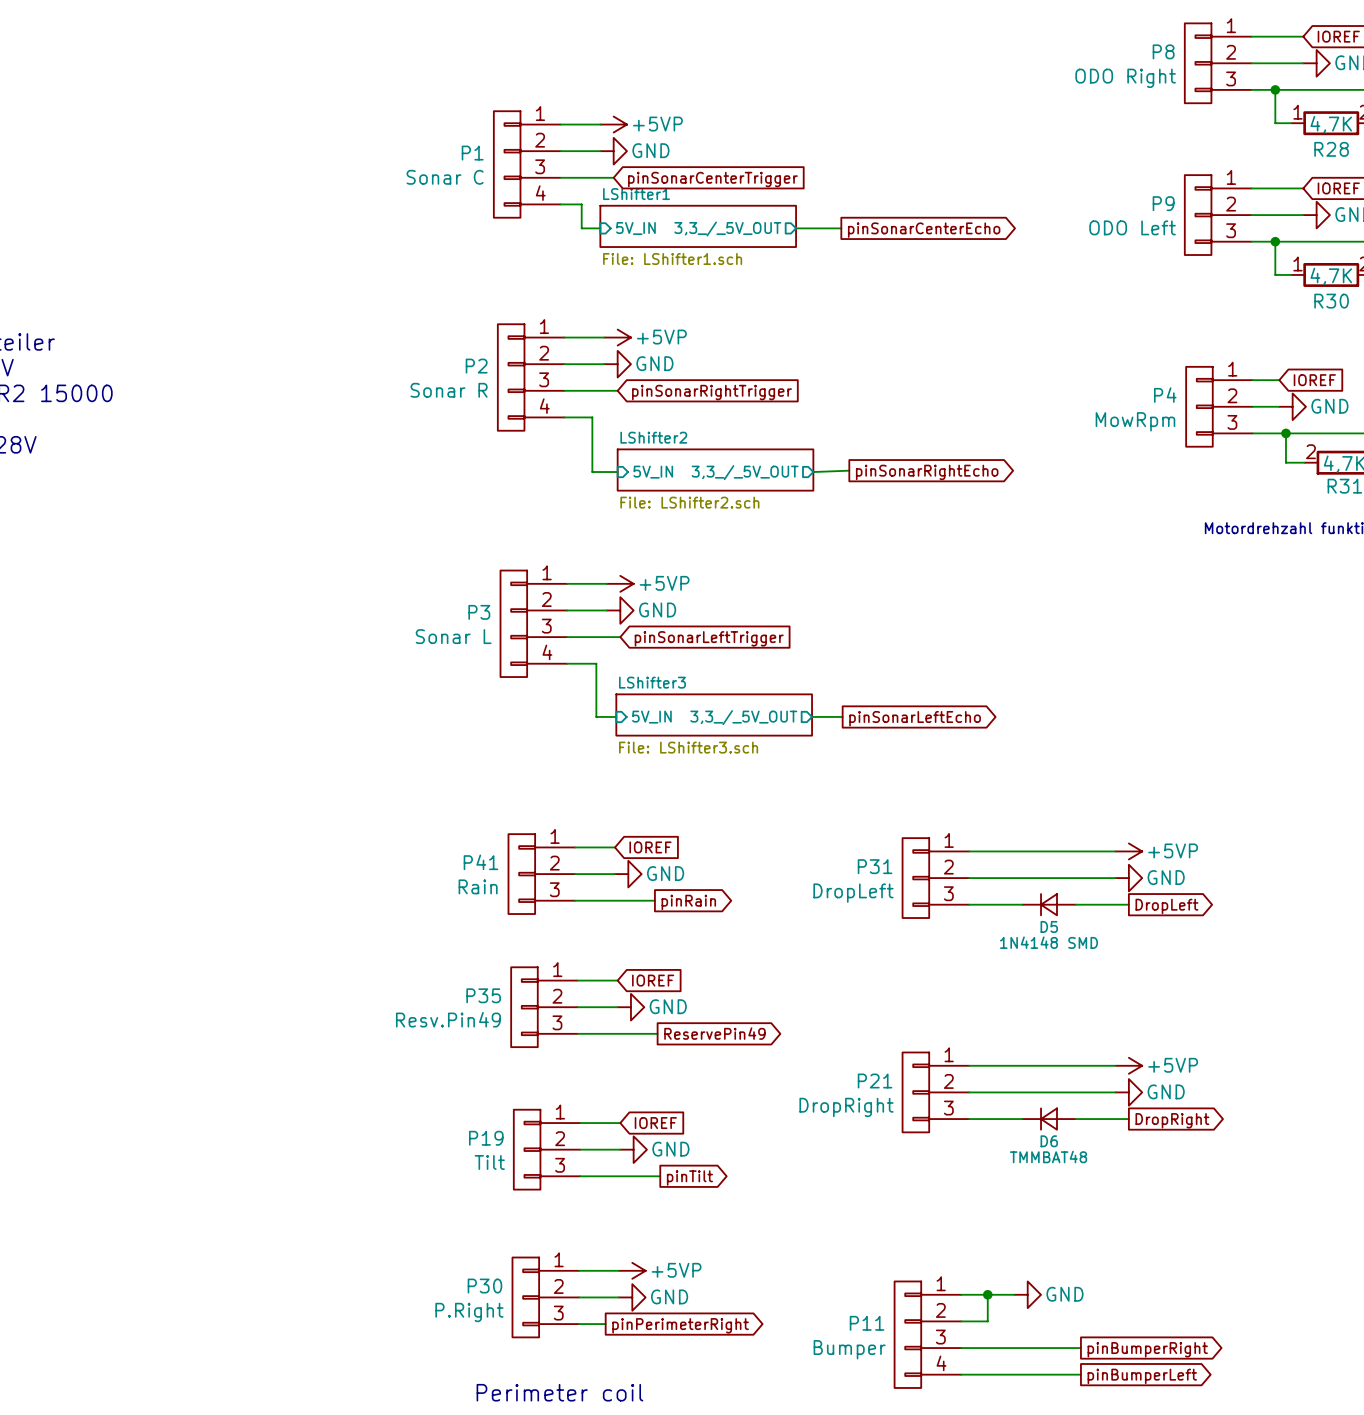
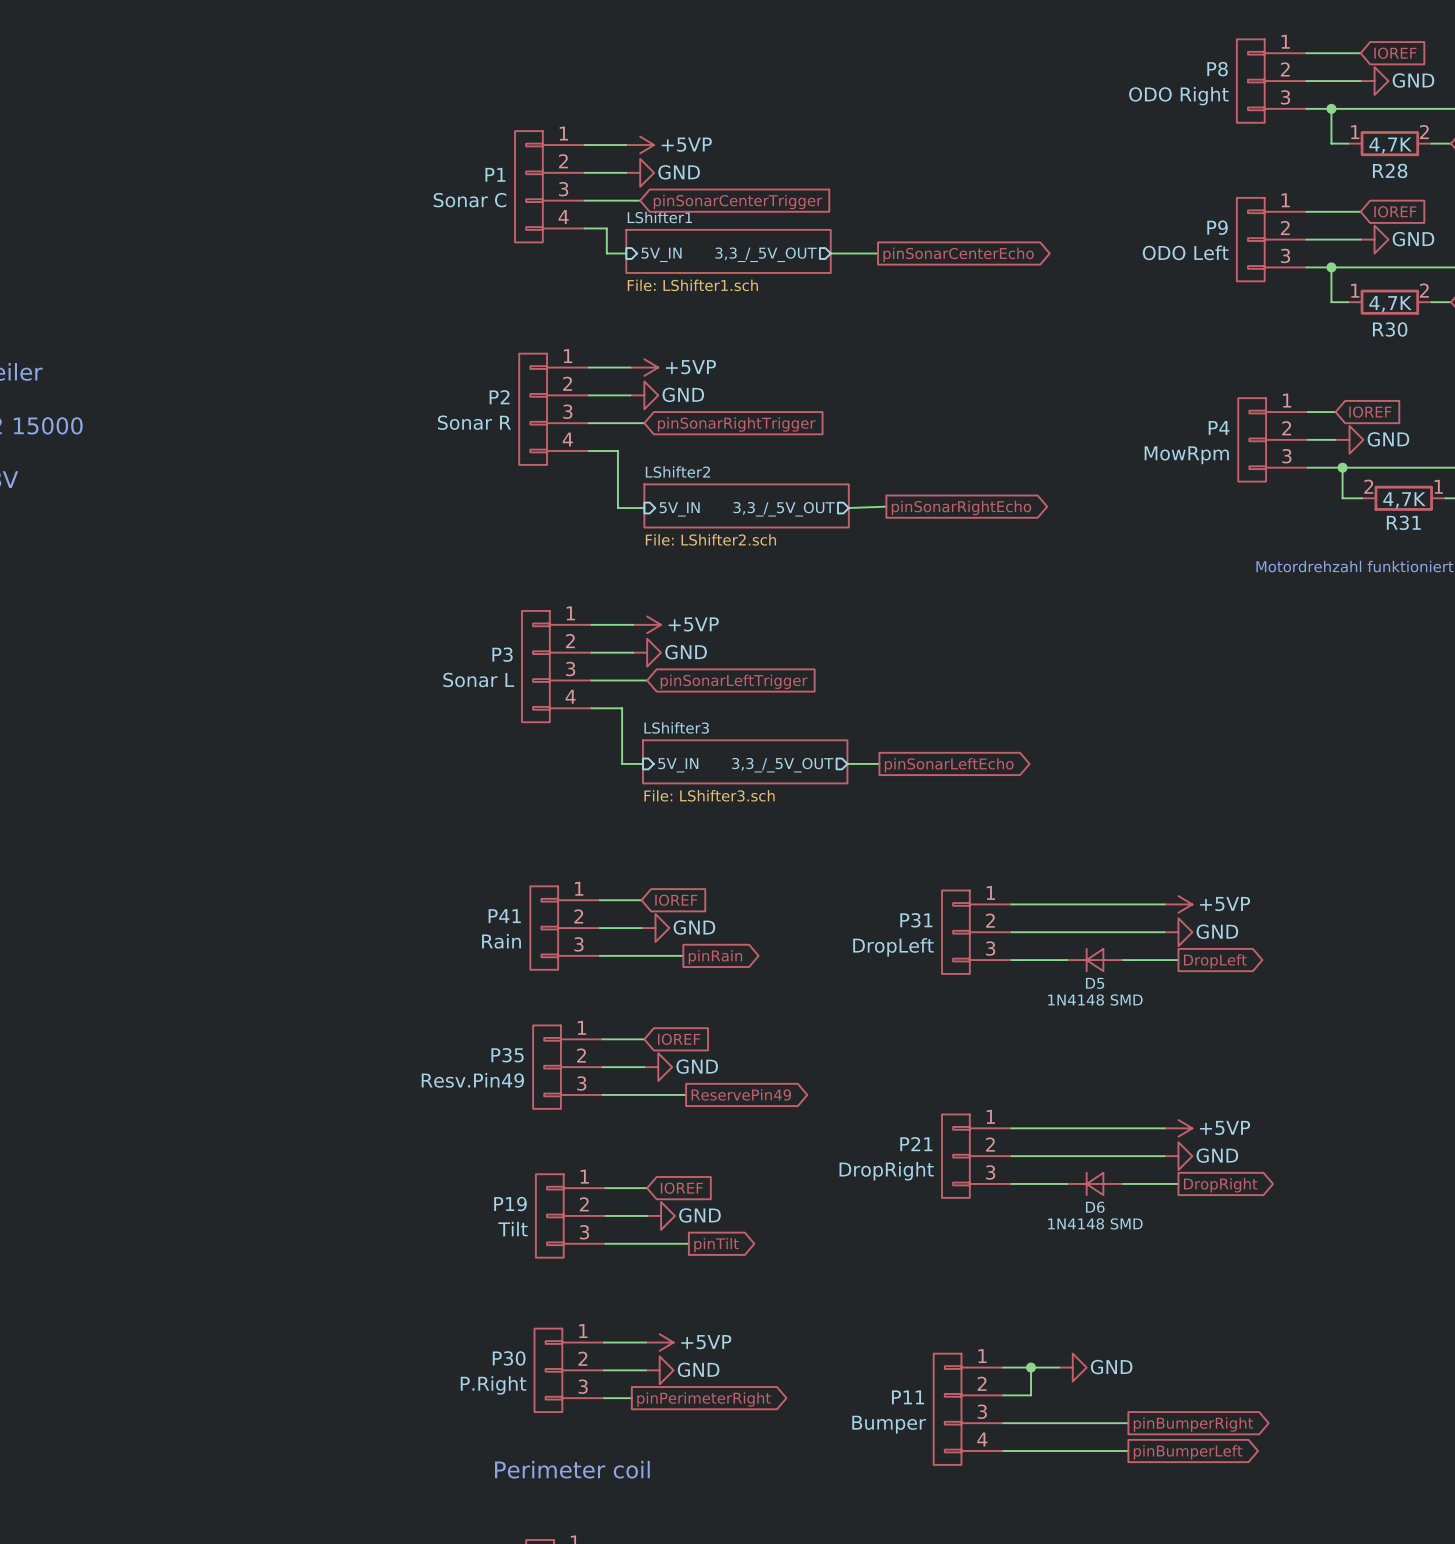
D6 value: TMMBAT48 (1048, 1157) -> 1N4148 SMD (1095, 1223)

